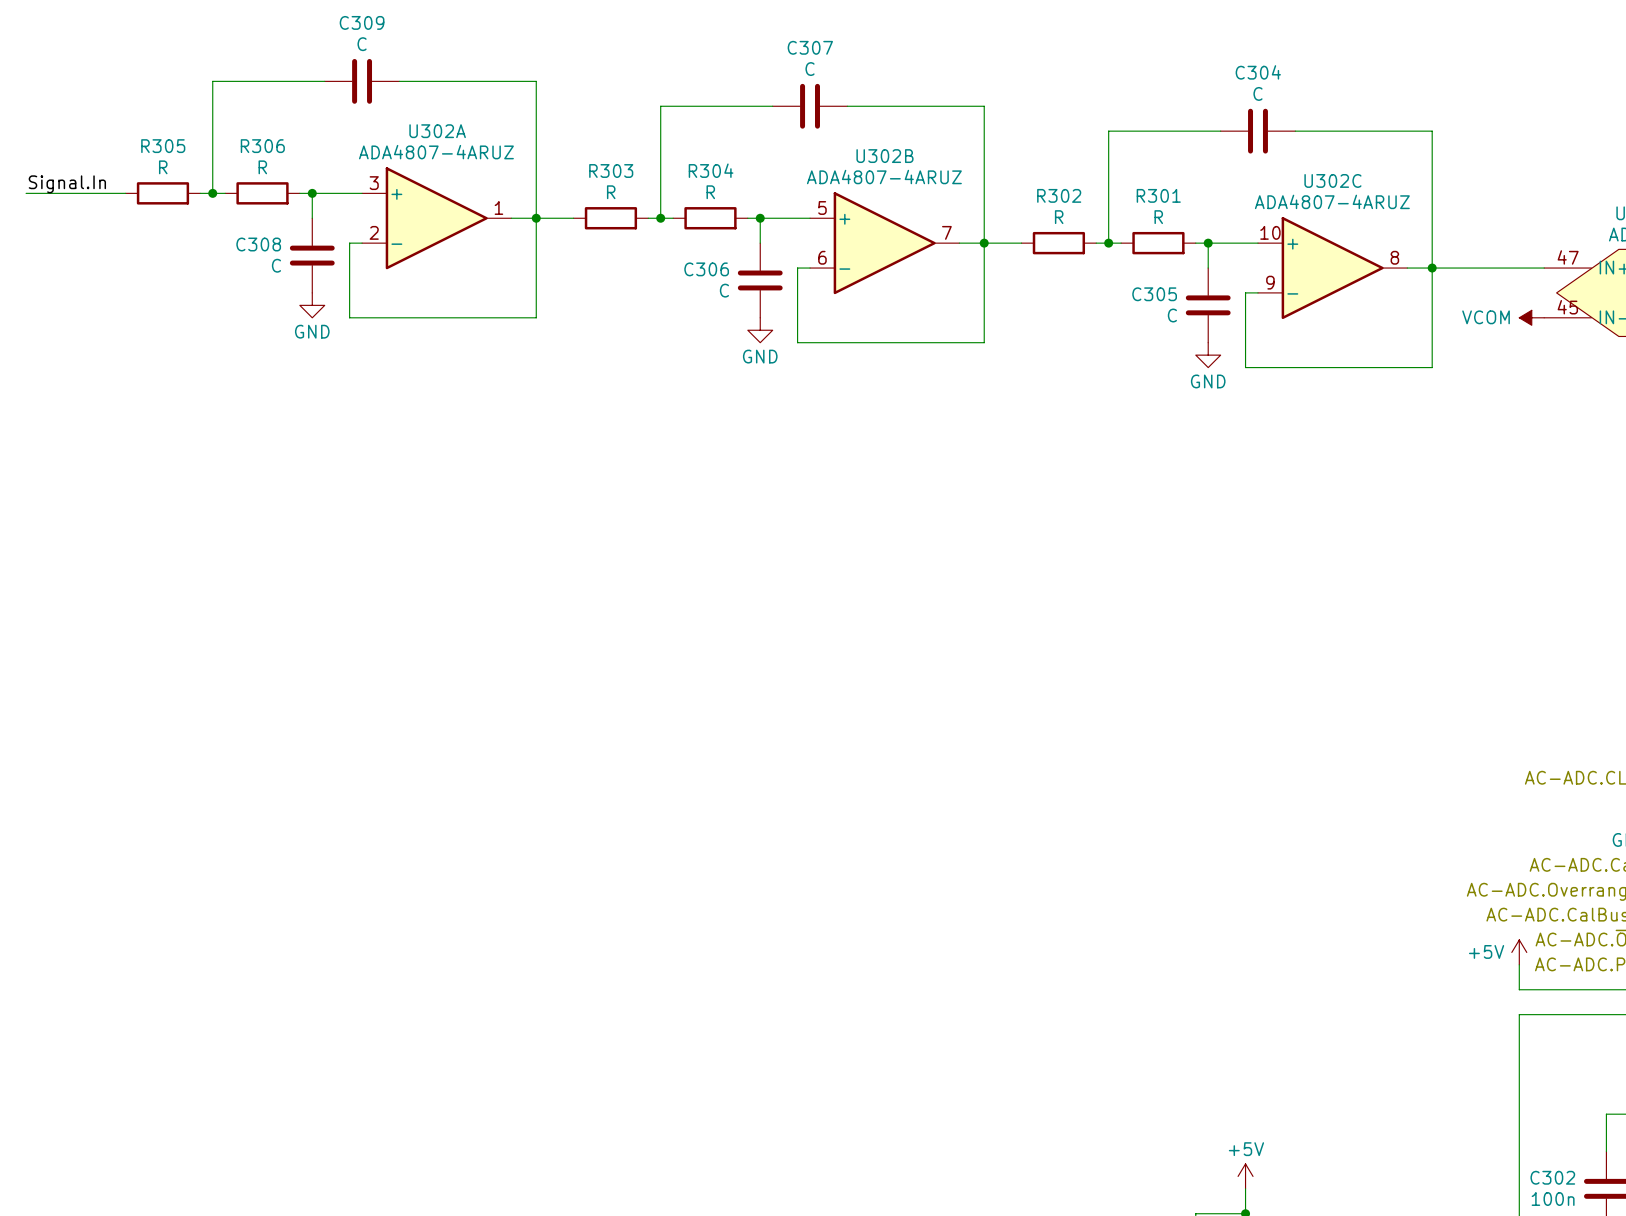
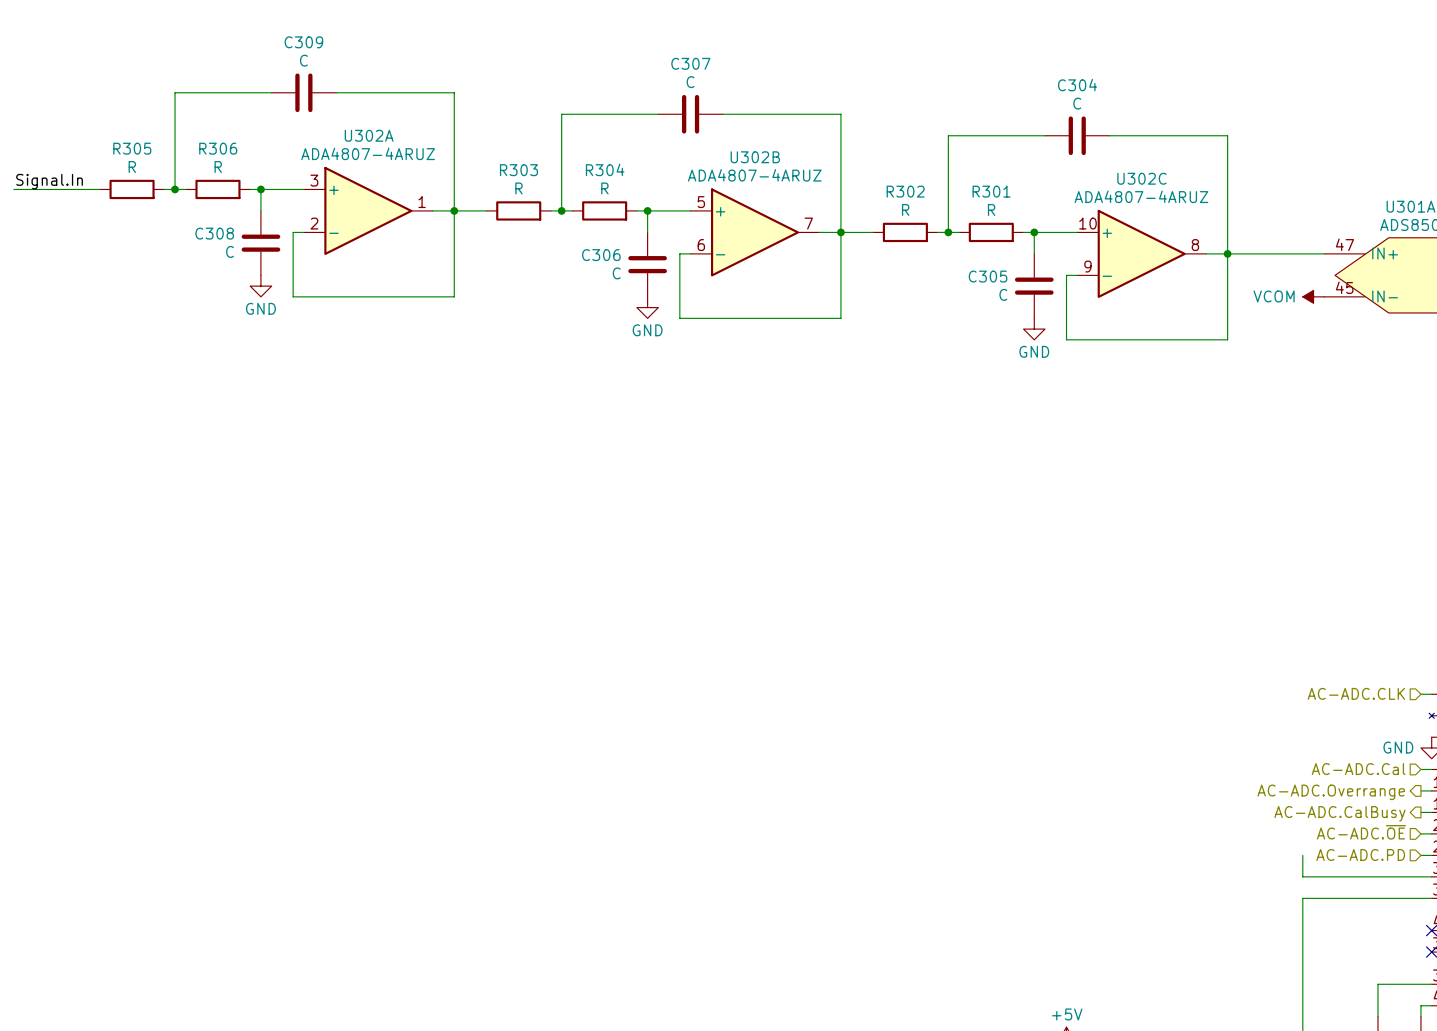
power symbol: +5V (1519, 952) -> none

